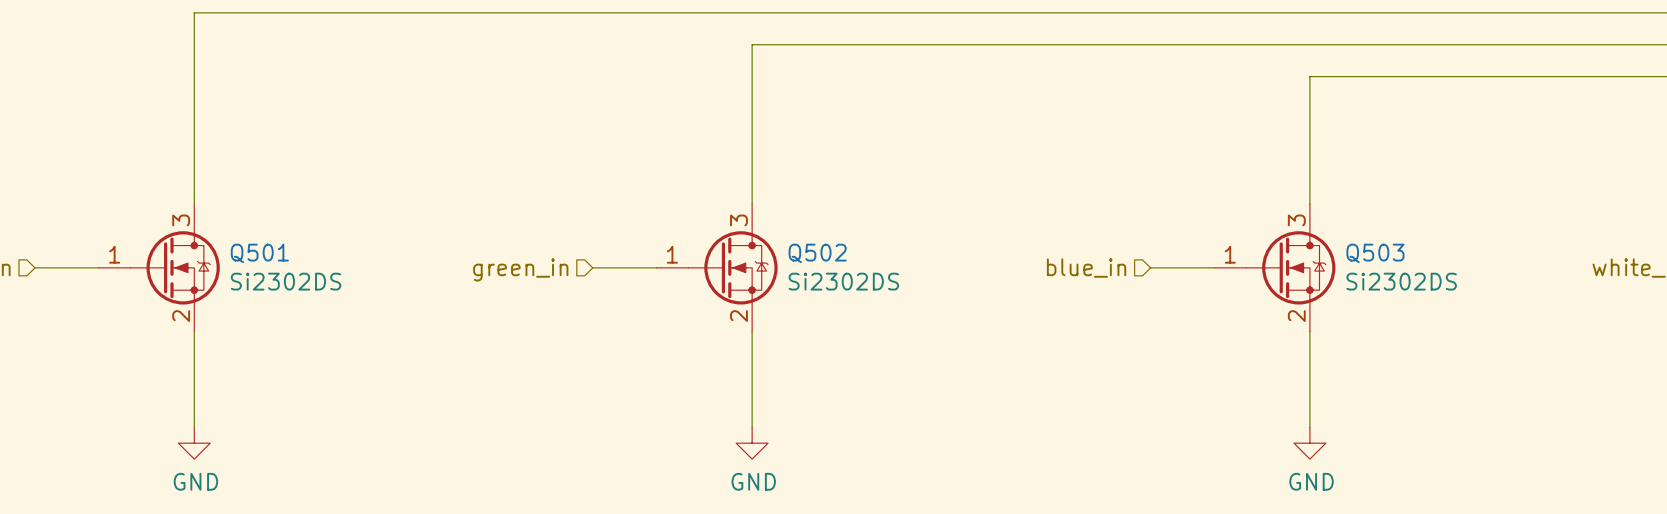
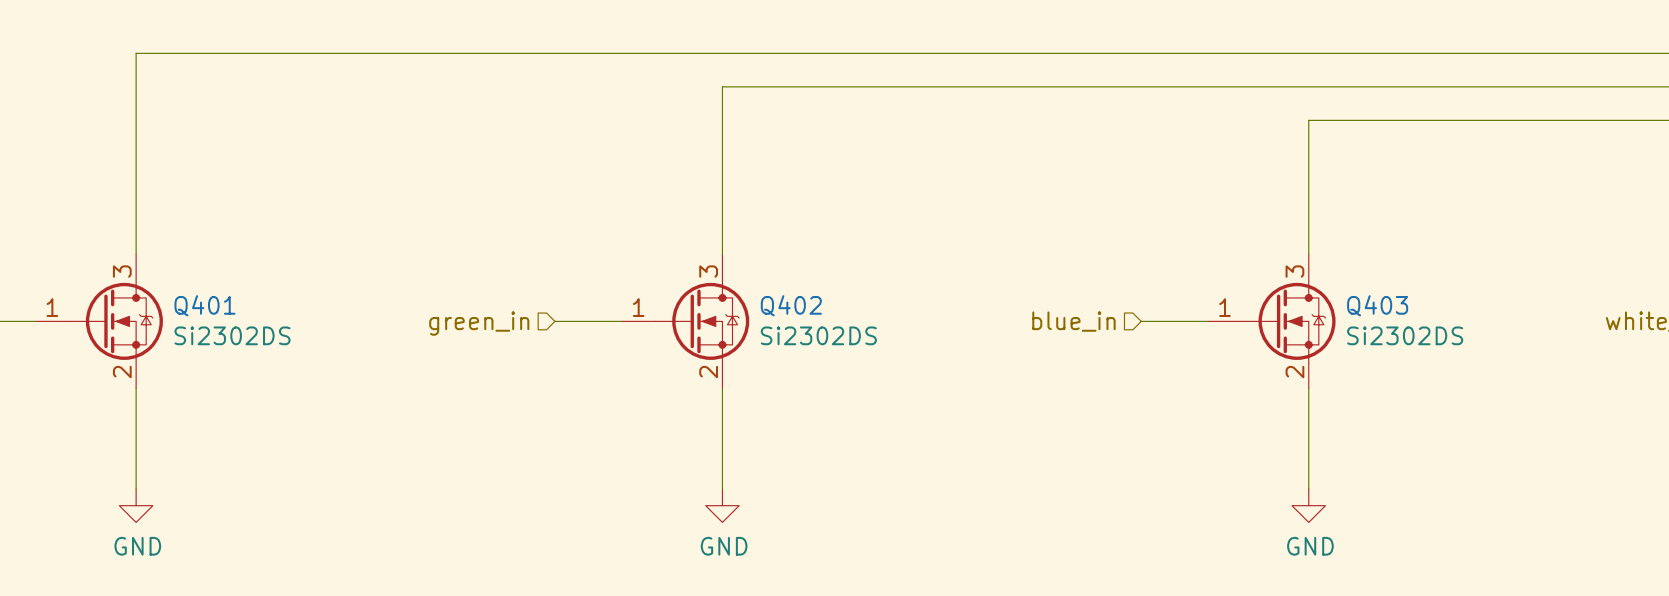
Q501 name: Q501 (259, 253) -> Q401 (205, 305)
Q502 name: Q502 (817, 253) -> Q402 (791, 305)
Q503 name: Q503 (1375, 253) -> Q403 (1377, 305)

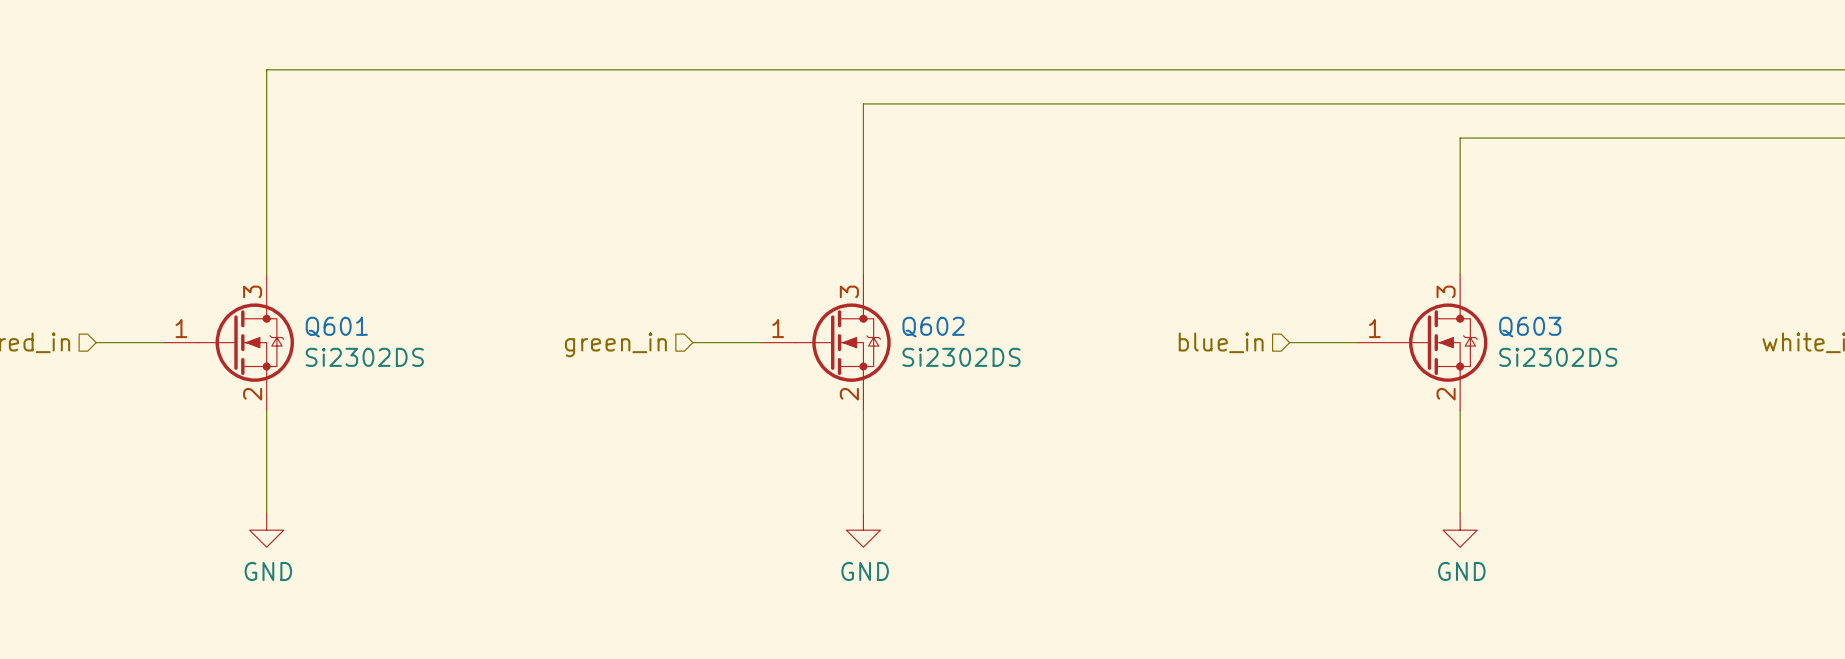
Q401 name: Q401 (205, 305) -> Q601 (336, 327)
Q402 name: Q402 (791, 305) -> Q602 (933, 327)
Q403 name: Q403 (1377, 305) -> Q603 (1530, 327)

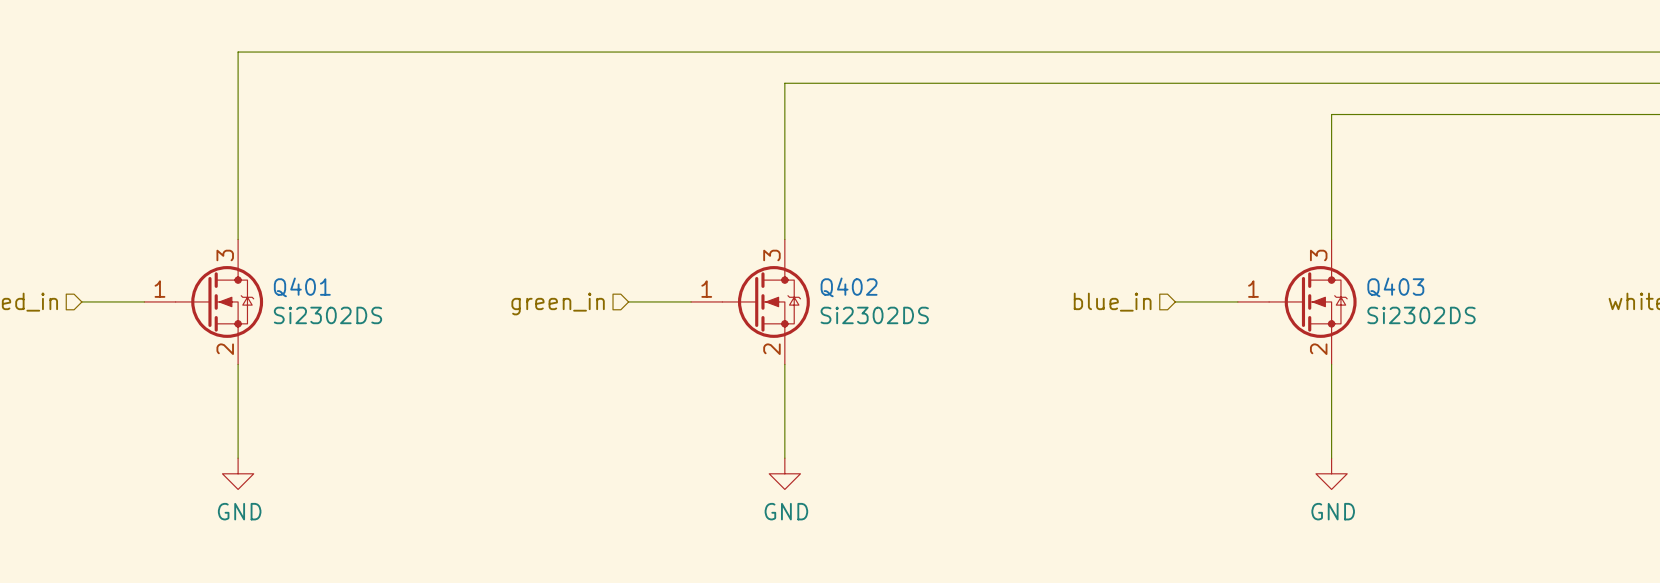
Q601 name: Q601 (336, 327) -> Q401 (302, 287)
Q602 name: Q602 (933, 327) -> Q402 (849, 287)
Q603 name: Q603 (1530, 327) -> Q403 (1395, 287)

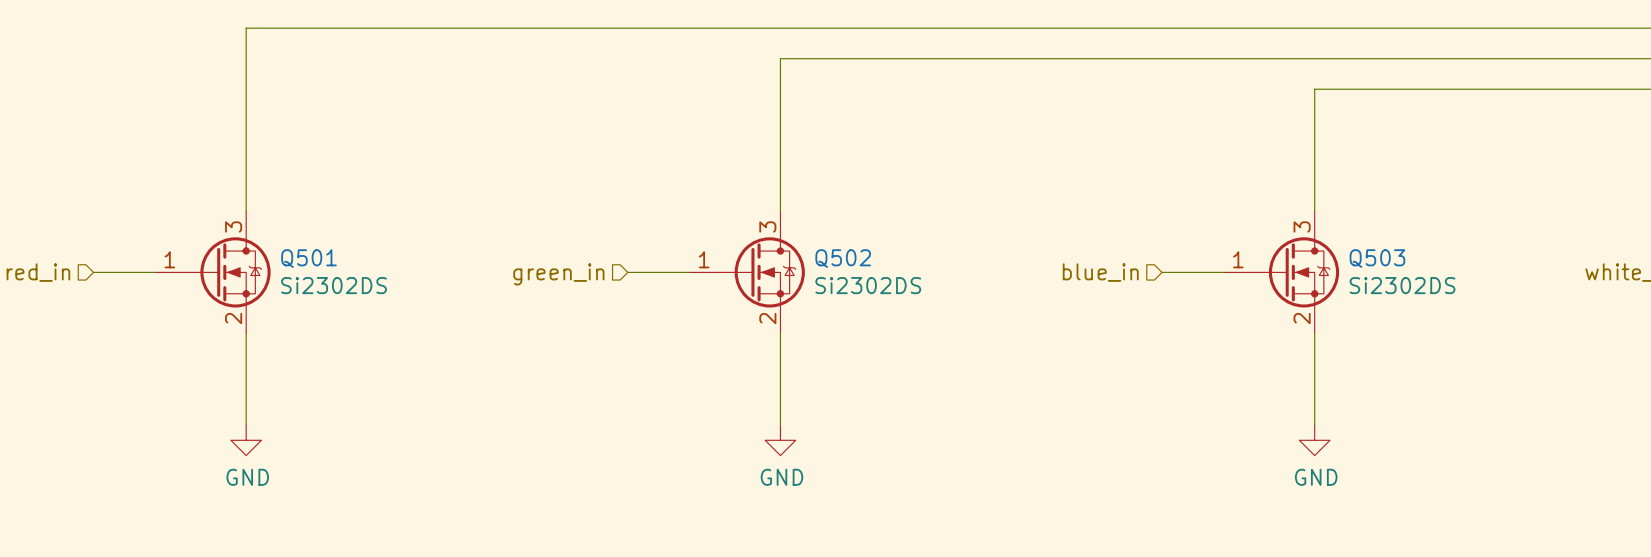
Q401 name: Q401 (302, 287) -> Q501 (308, 258)
Q402 name: Q402 (849, 287) -> Q502 (843, 258)
Q403 name: Q403 (1395, 287) -> Q503 (1377, 258)

